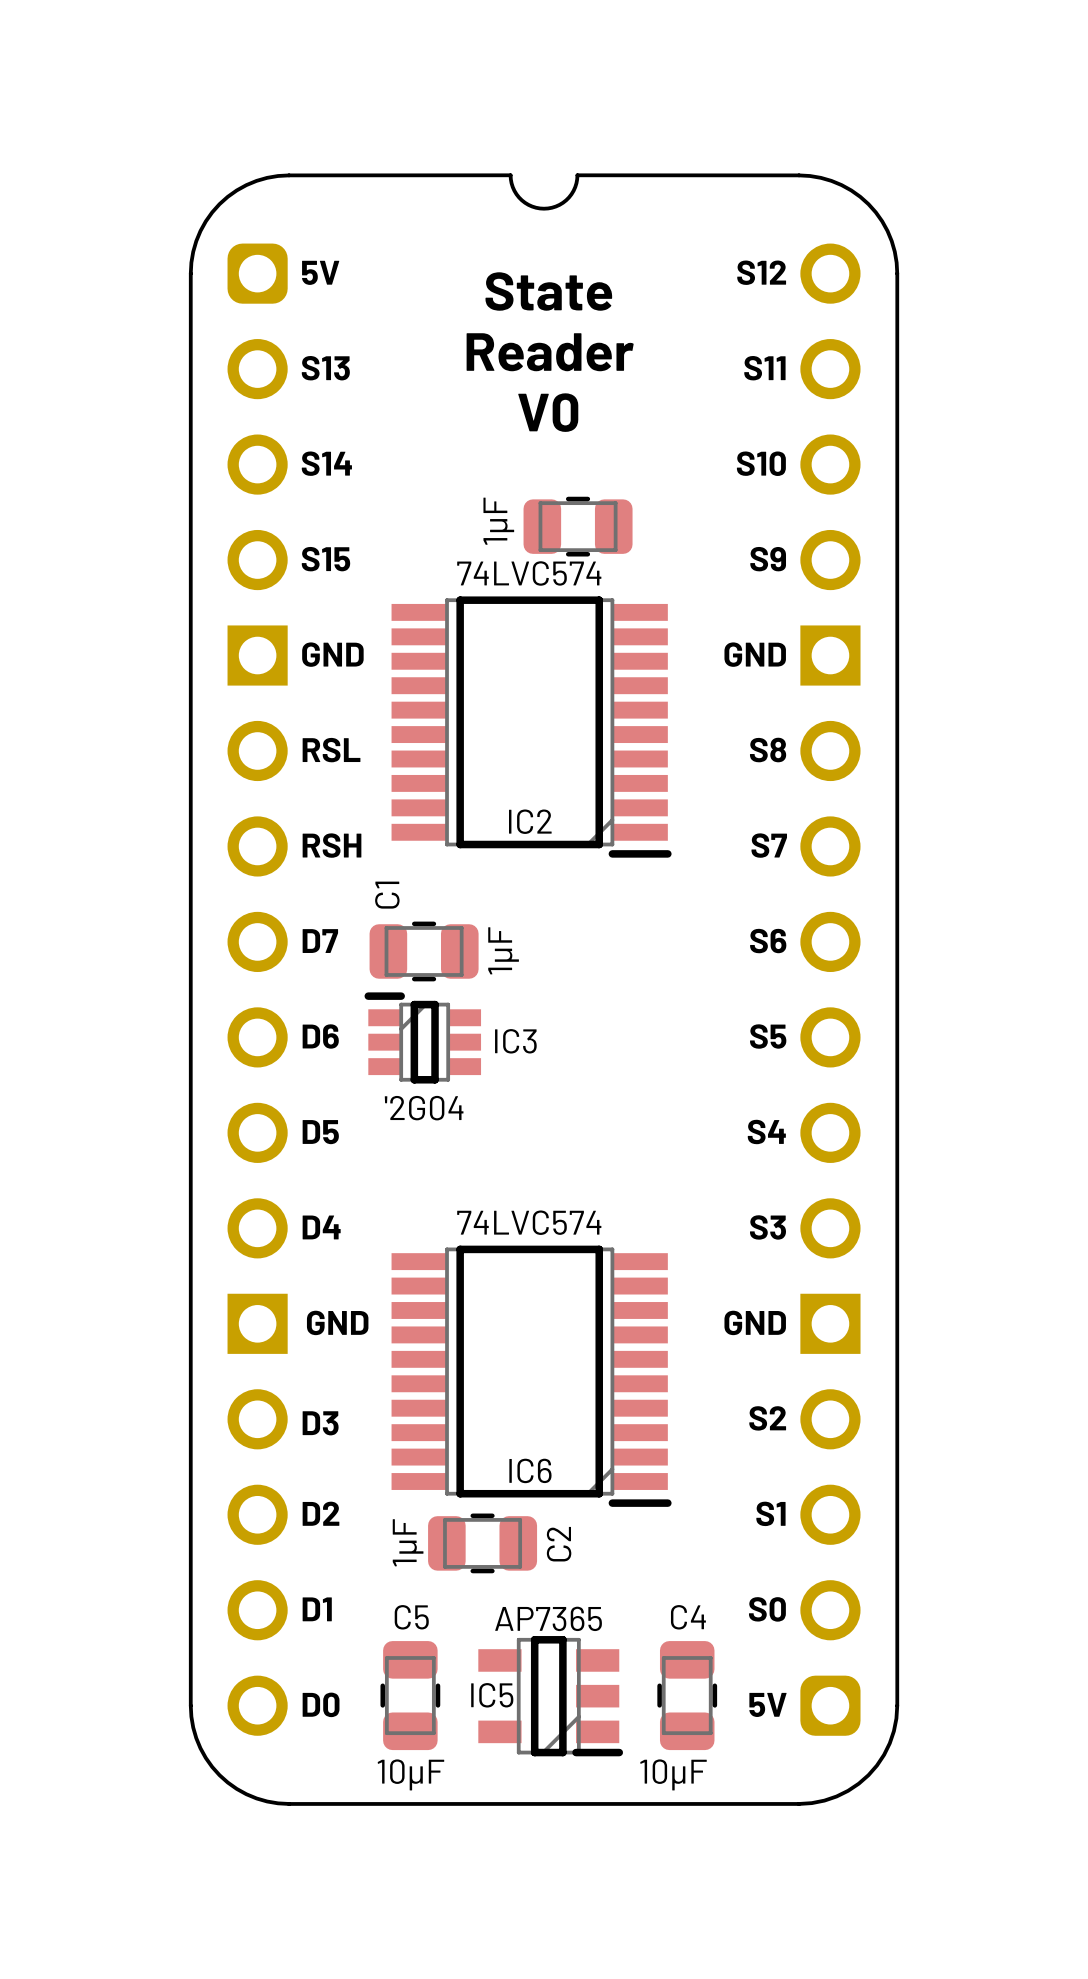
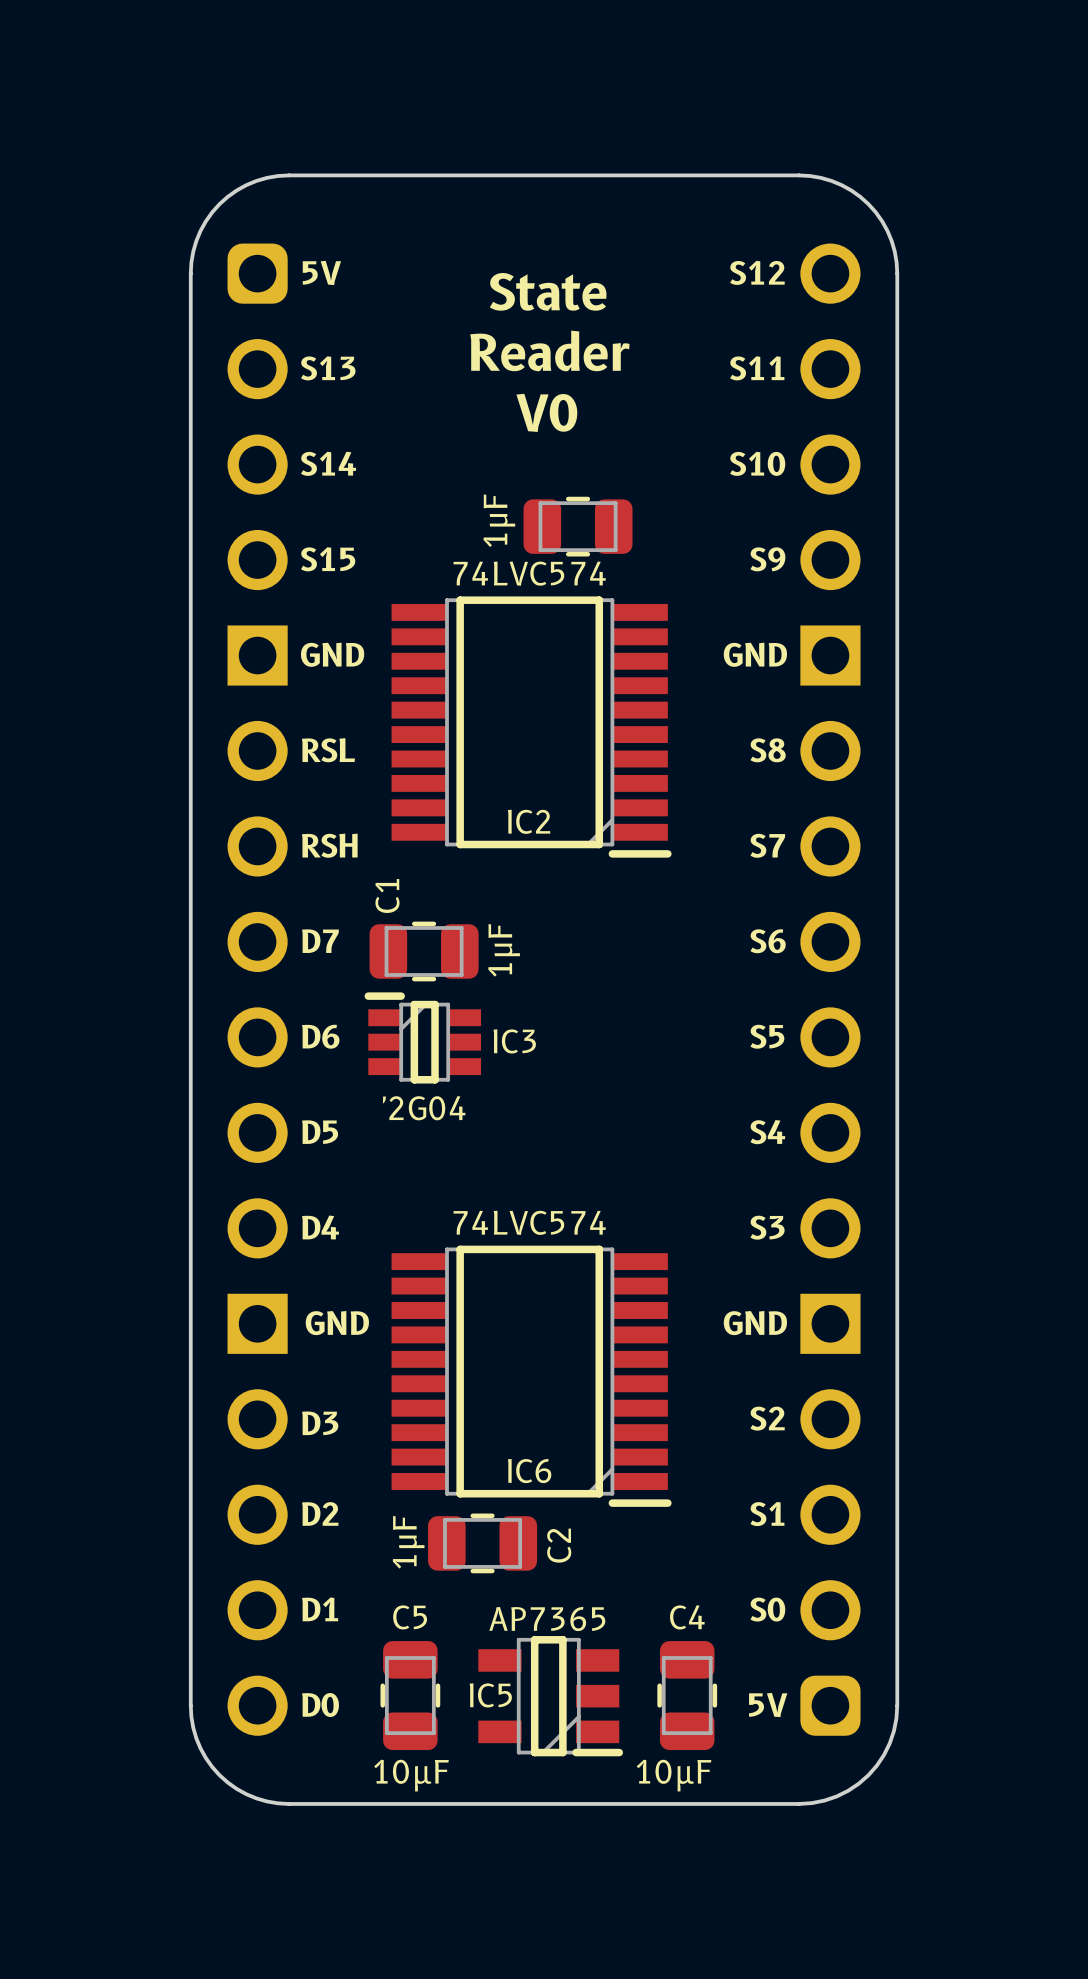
part footprint: [188, 173, 900, 1806] -> [188, 173, 900, 1806]

